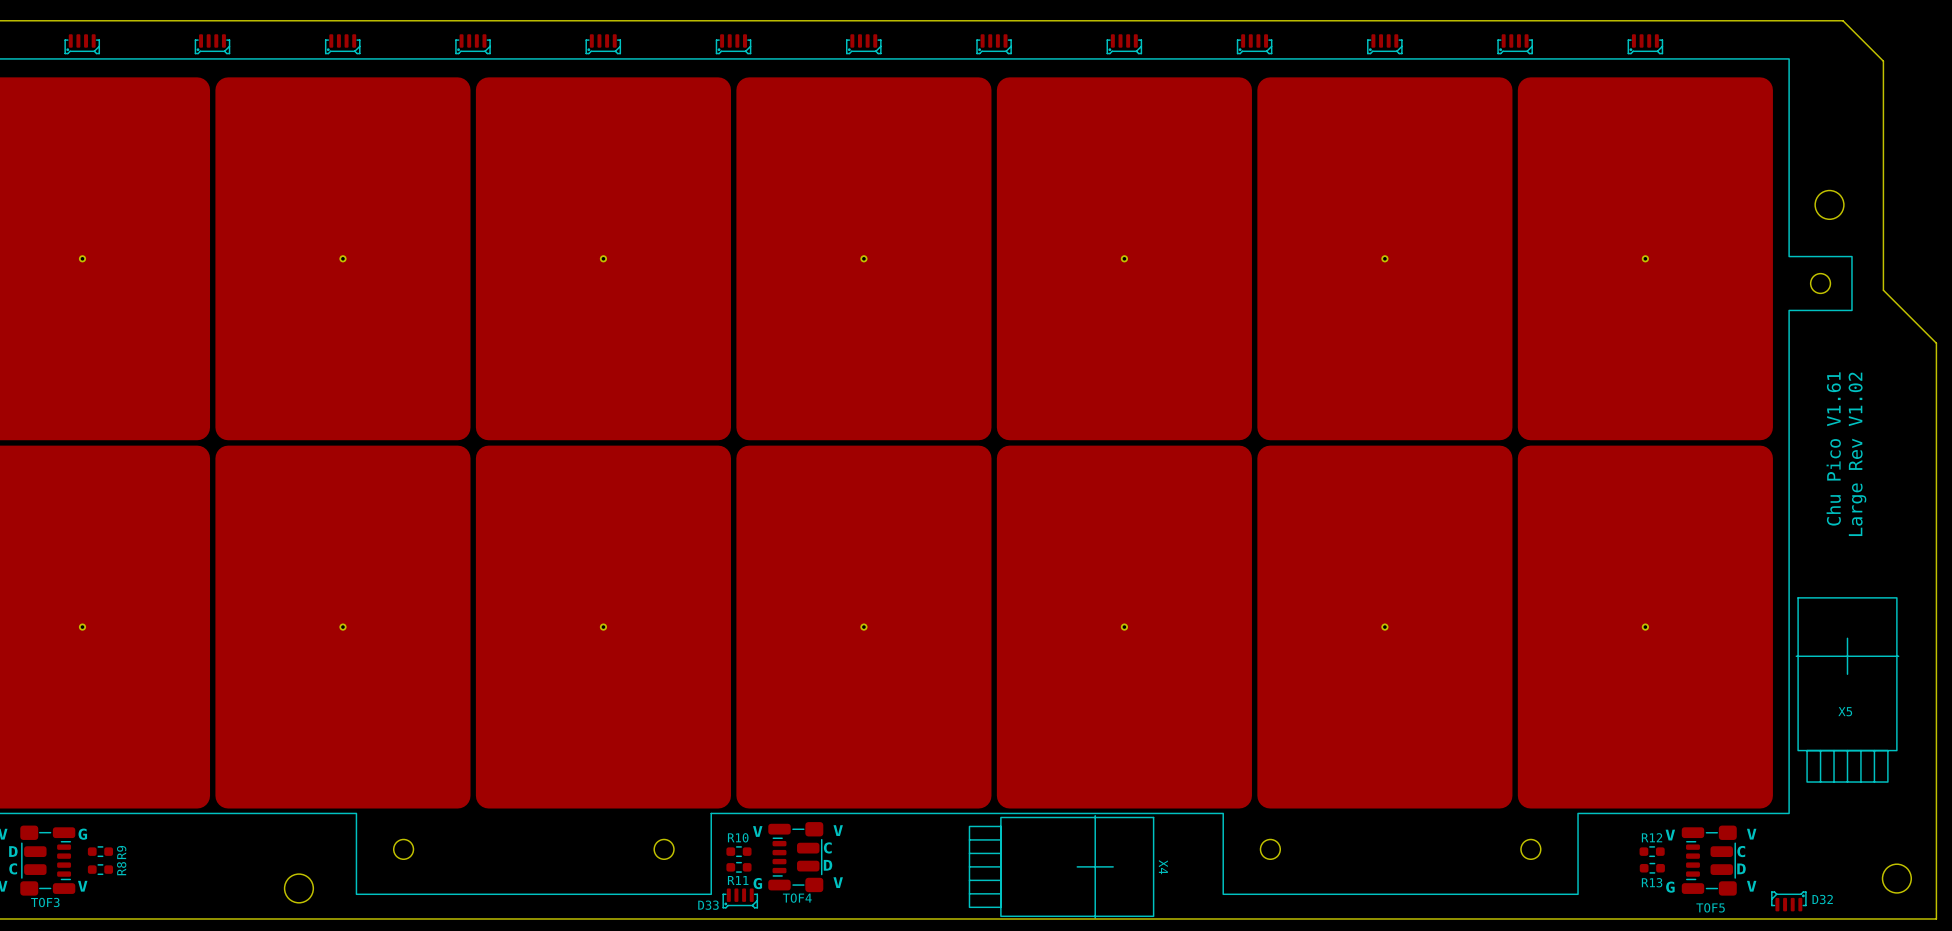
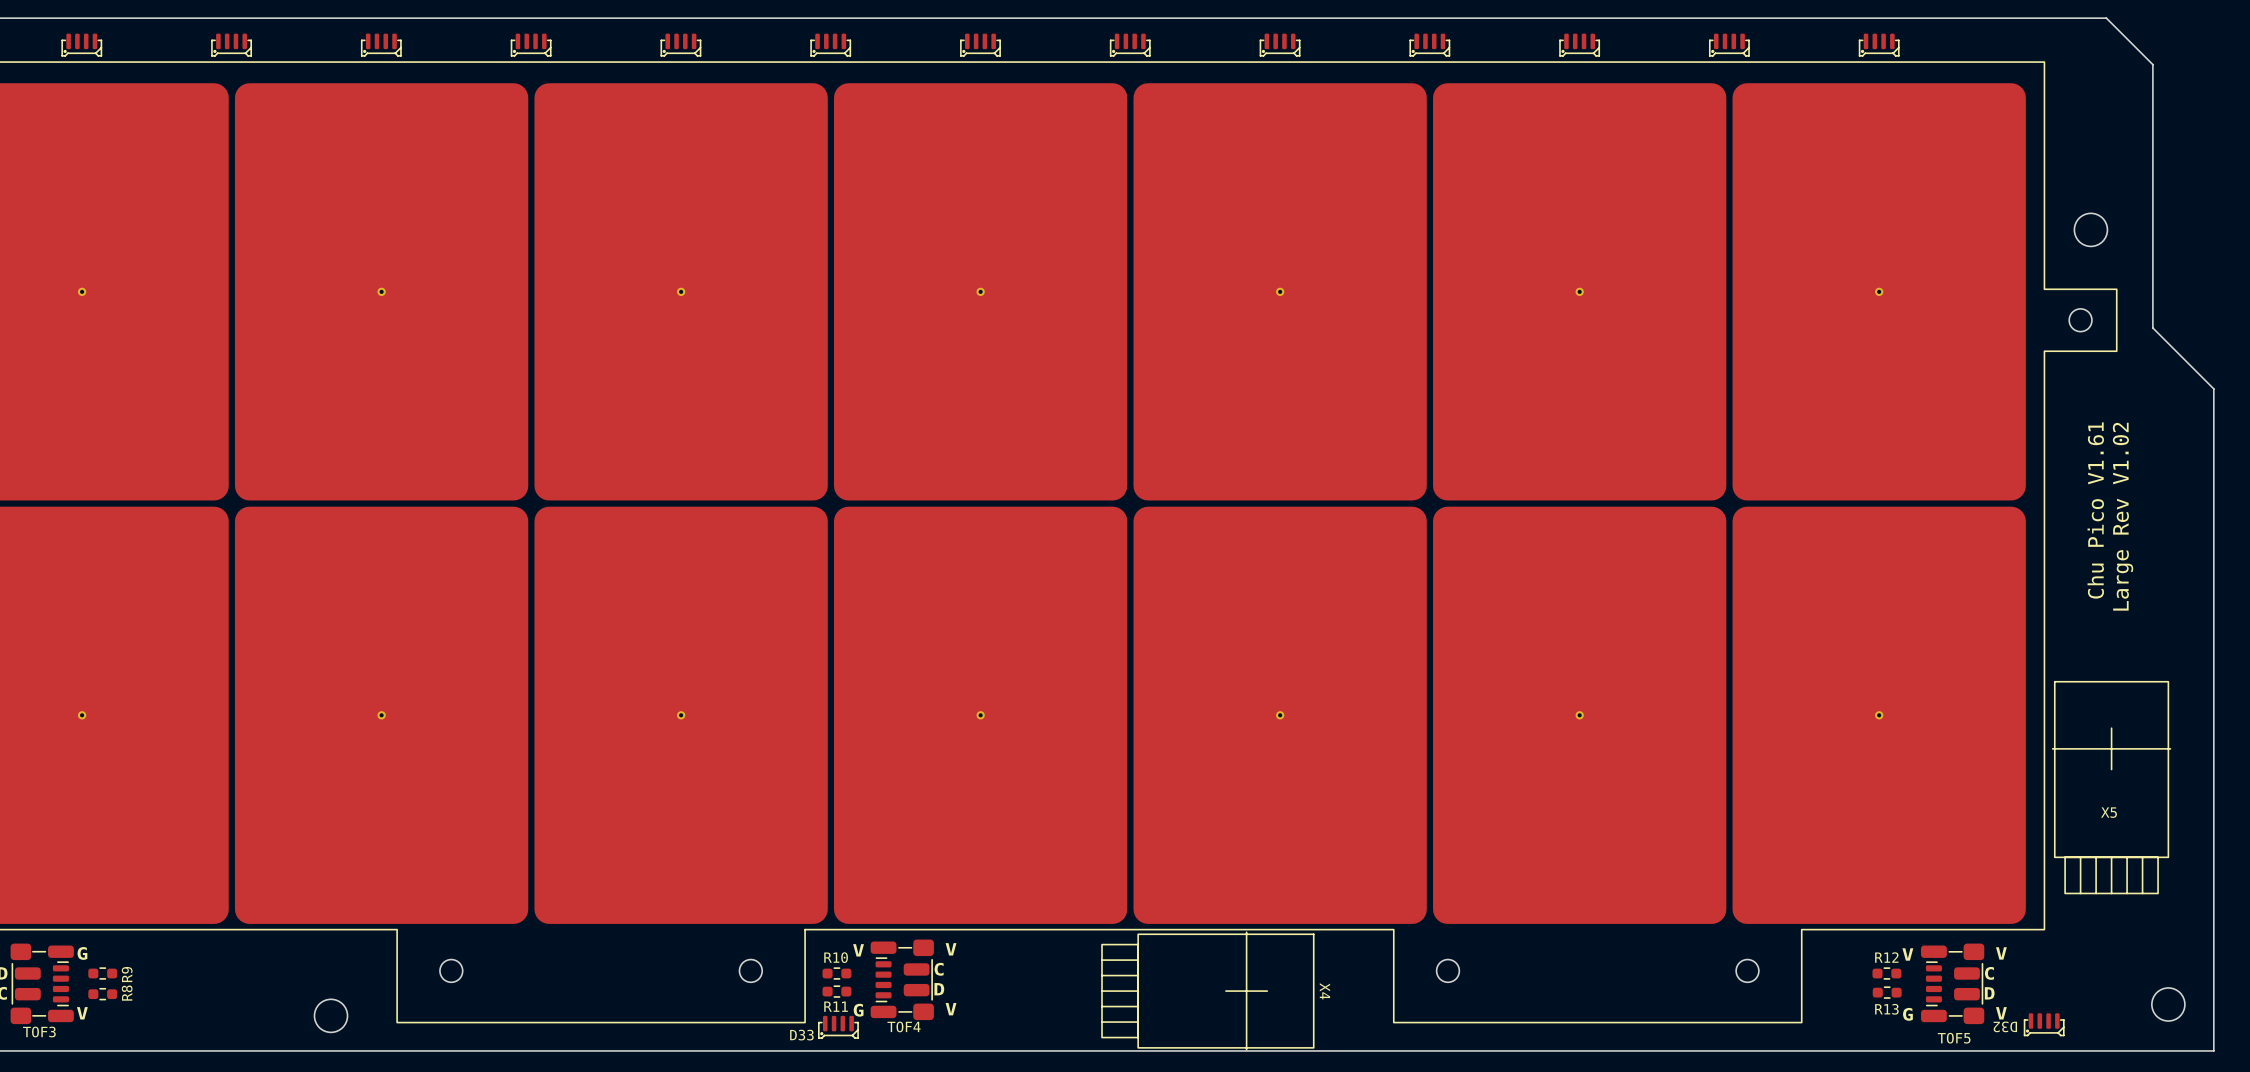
D32 rotation: 0° (1788, 901) -> 180° (2044, 1024)

